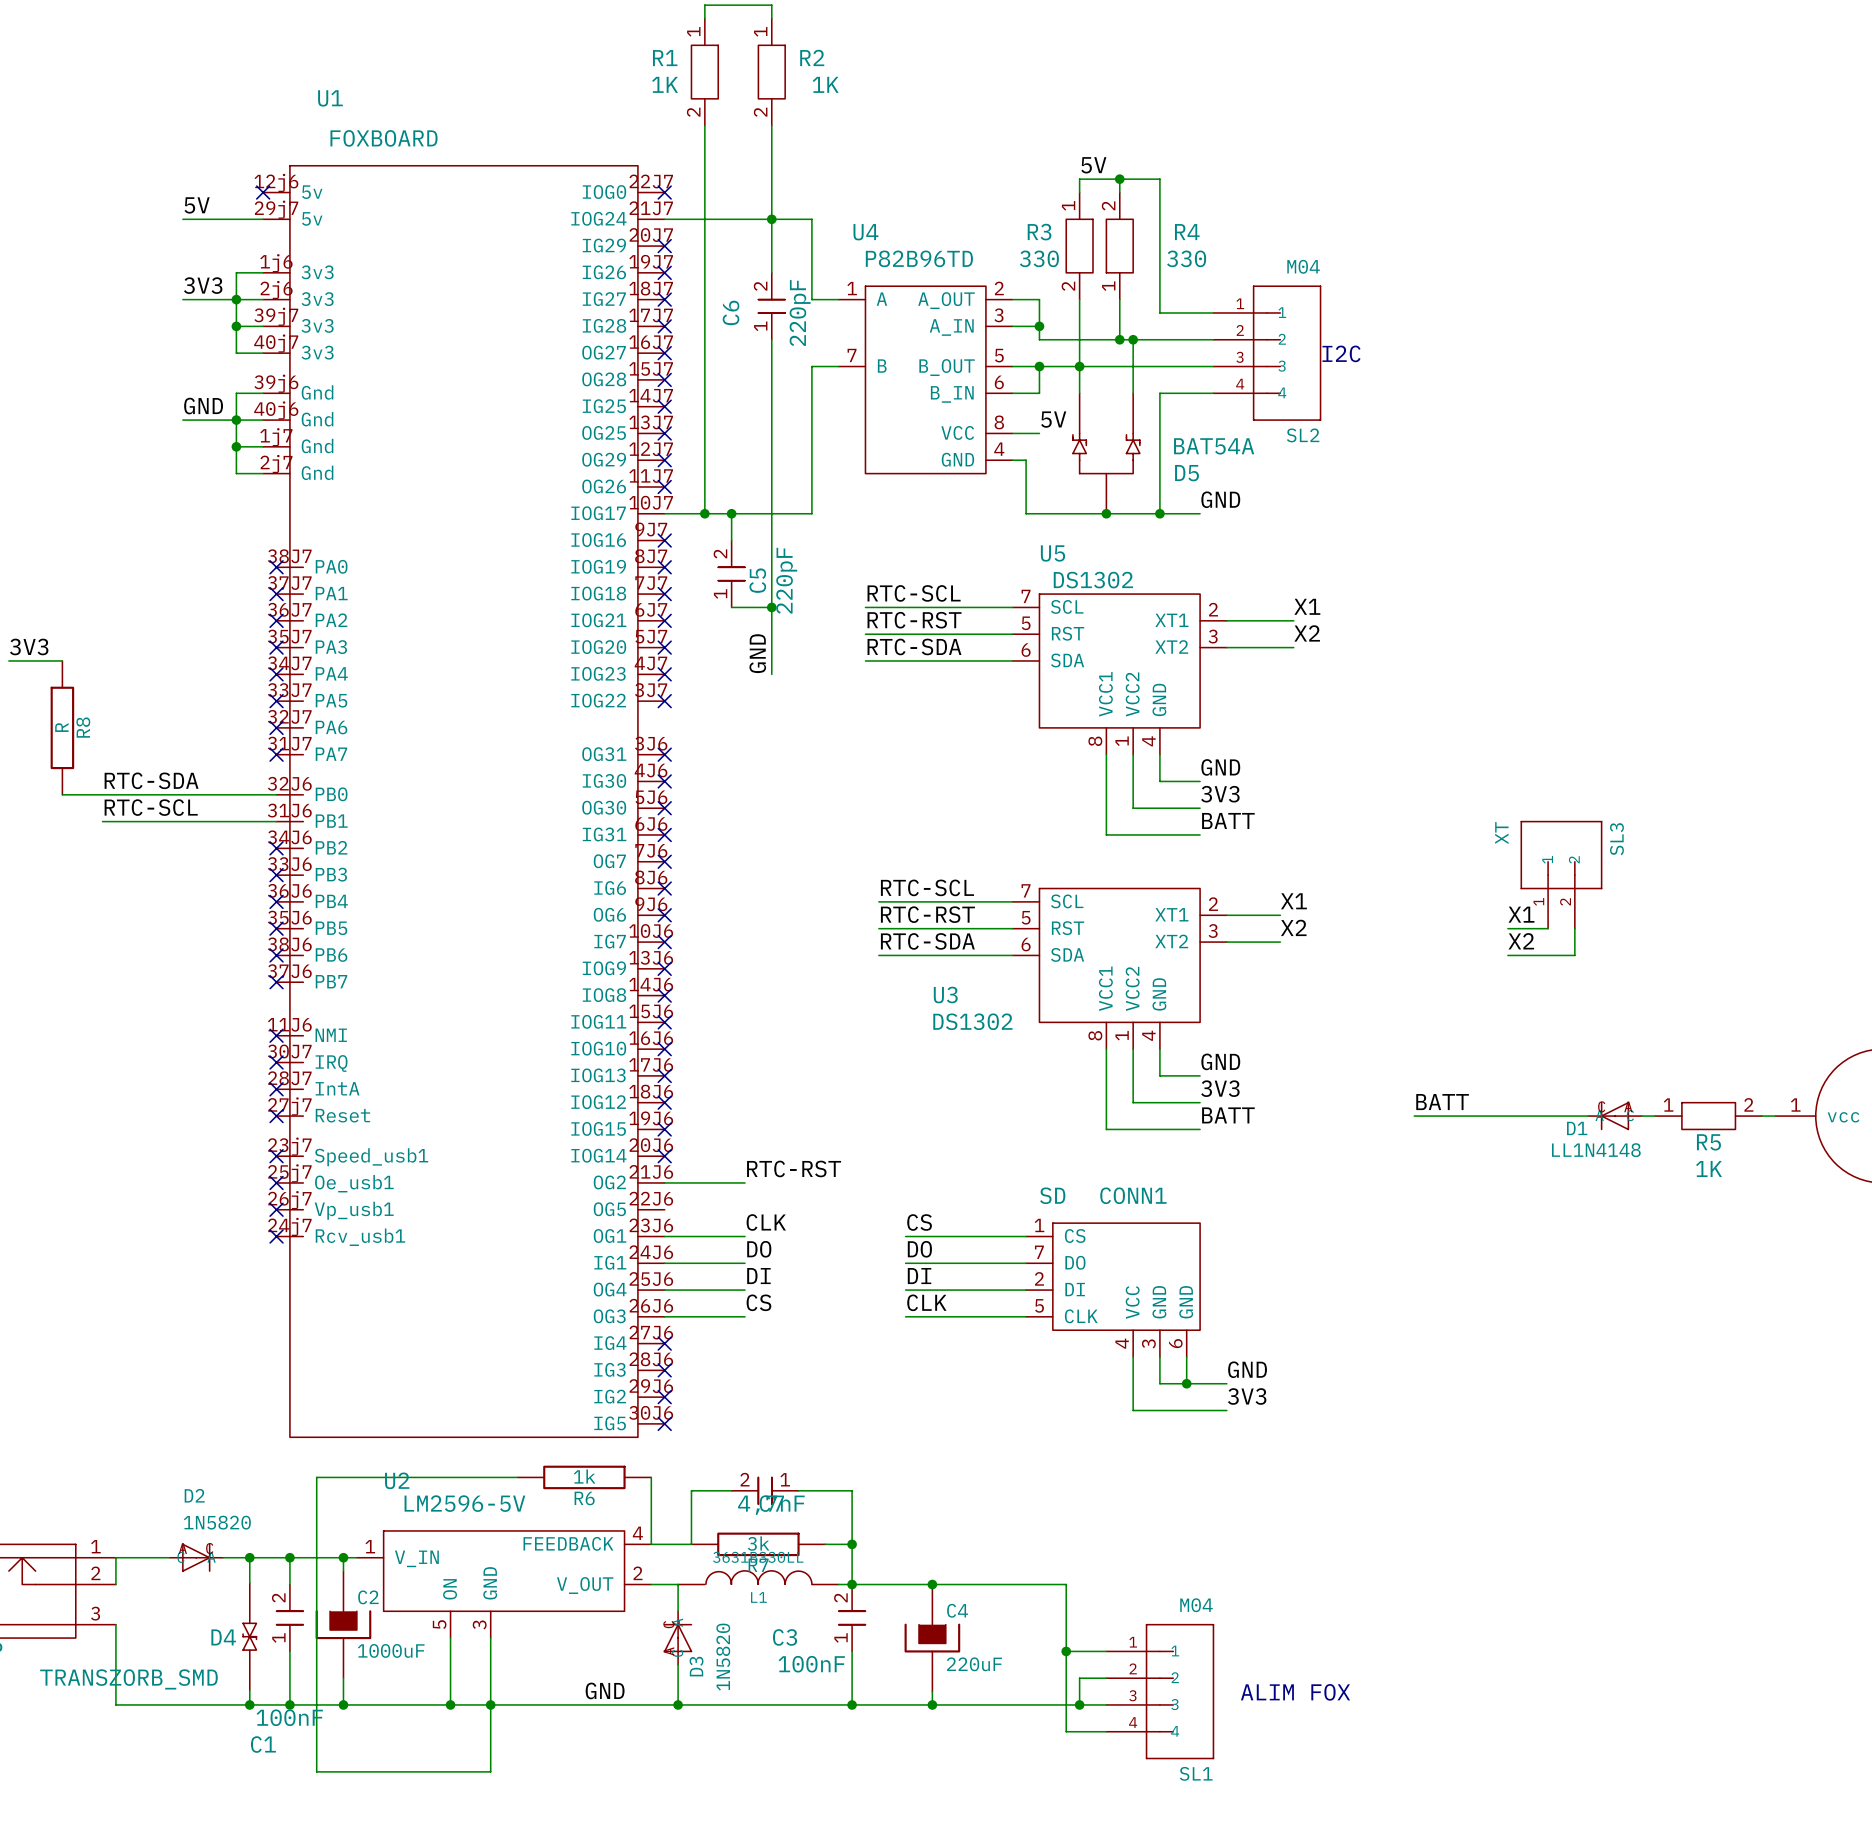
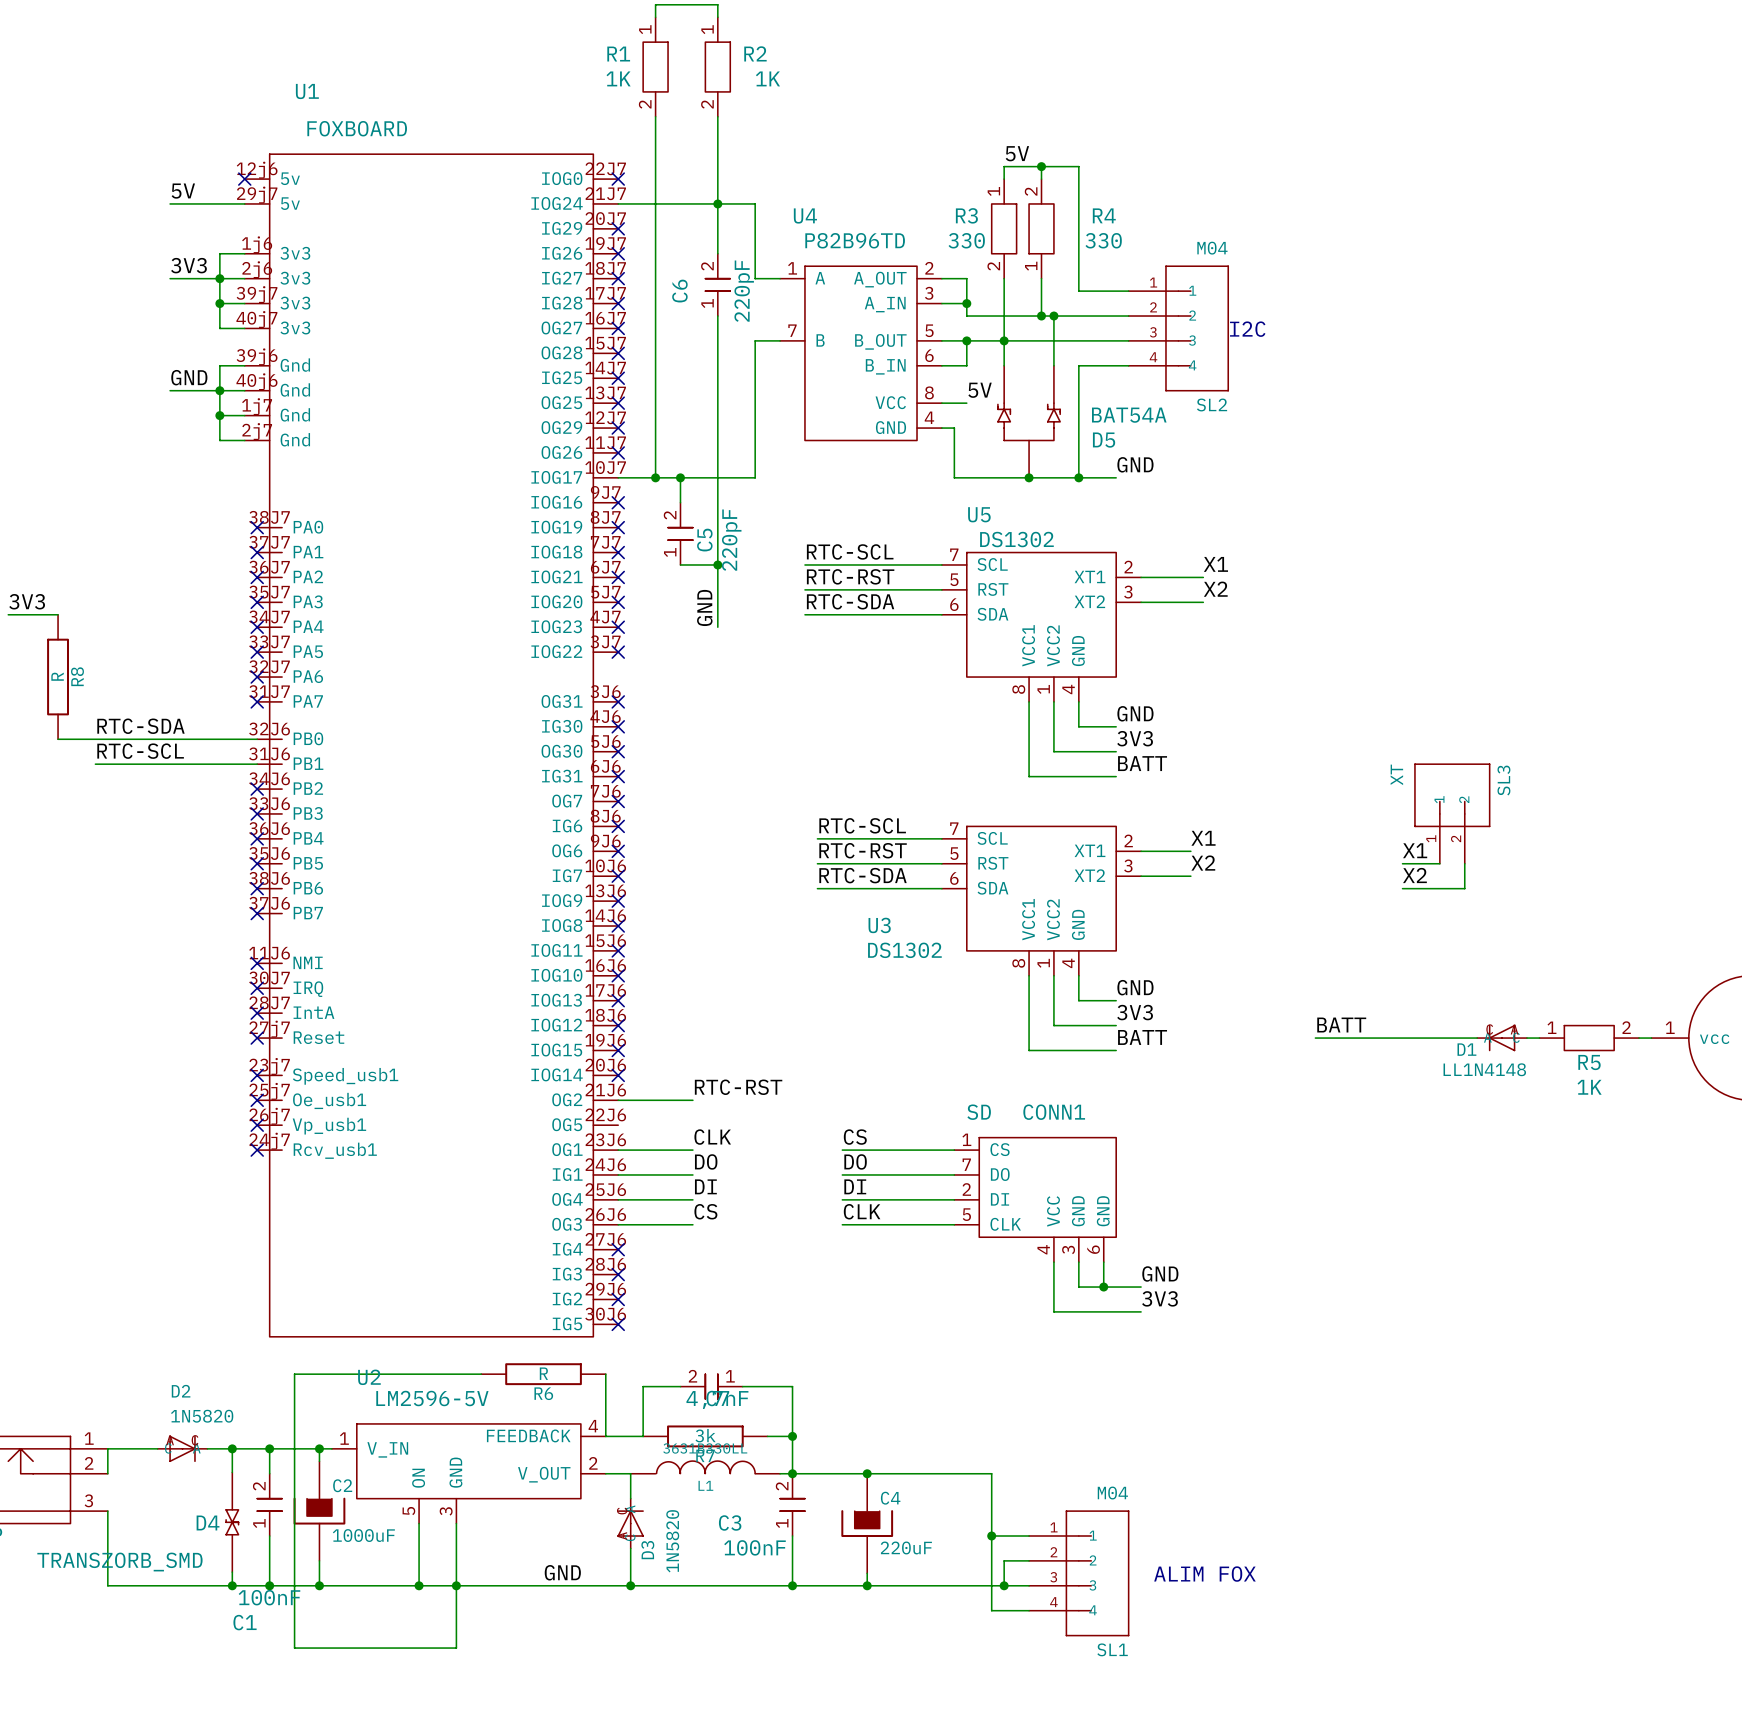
R6 value: 1k (584, 1476) -> R (543, 1373)

